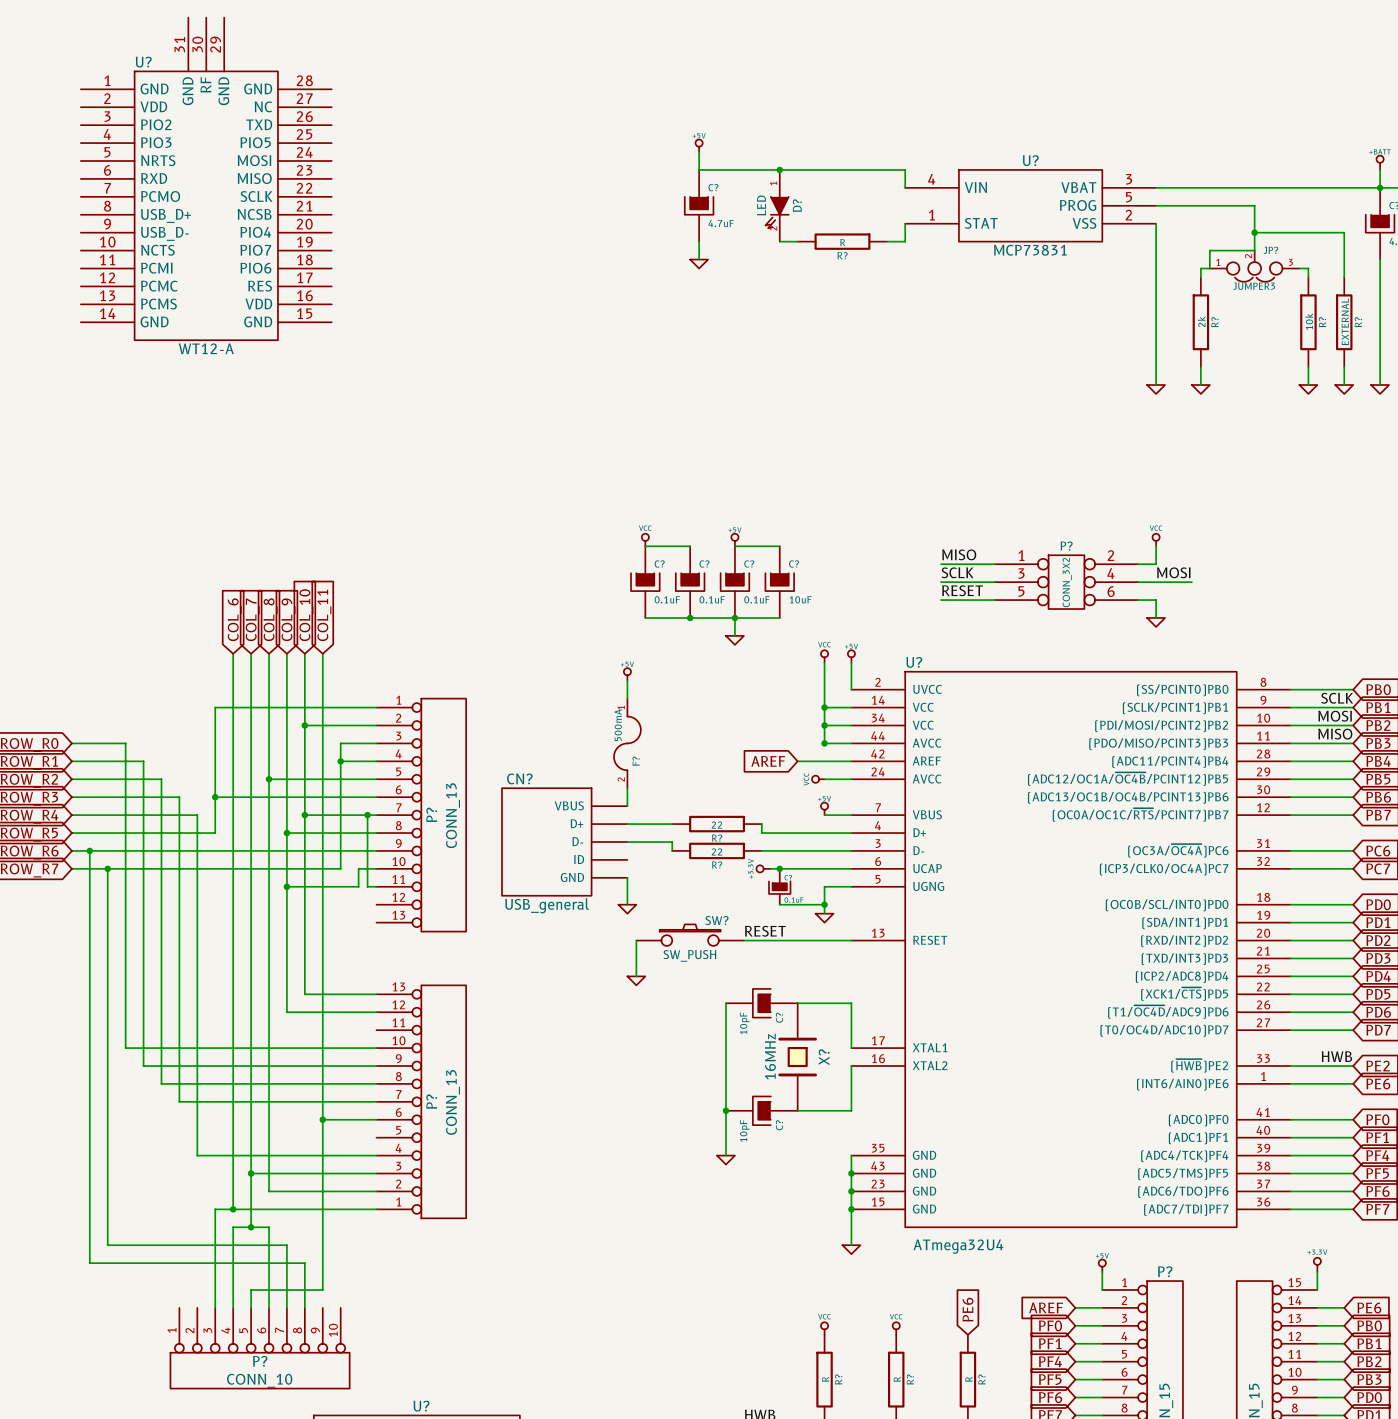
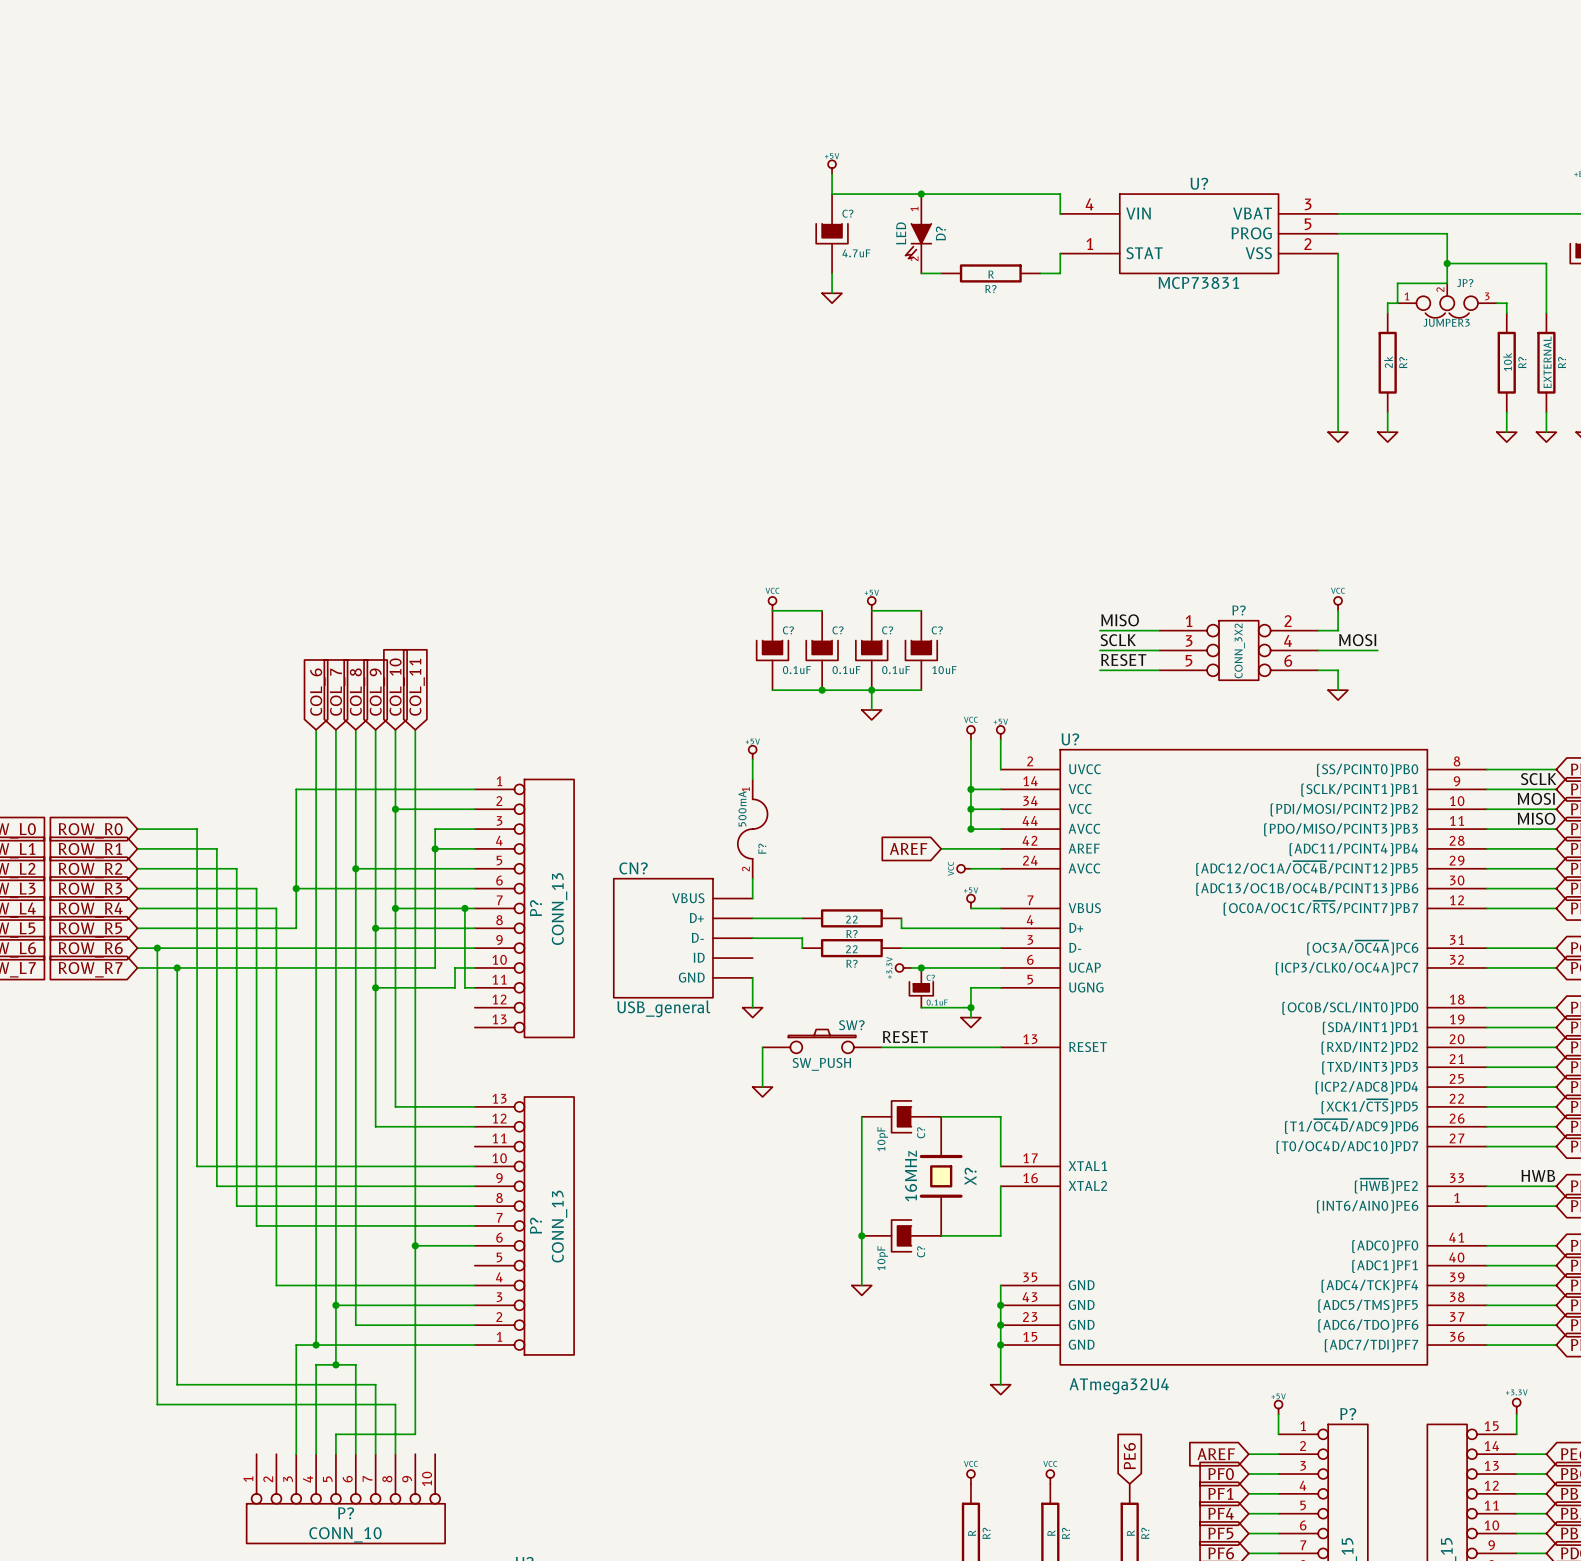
U?: WT12-A (206, 178) -> none

